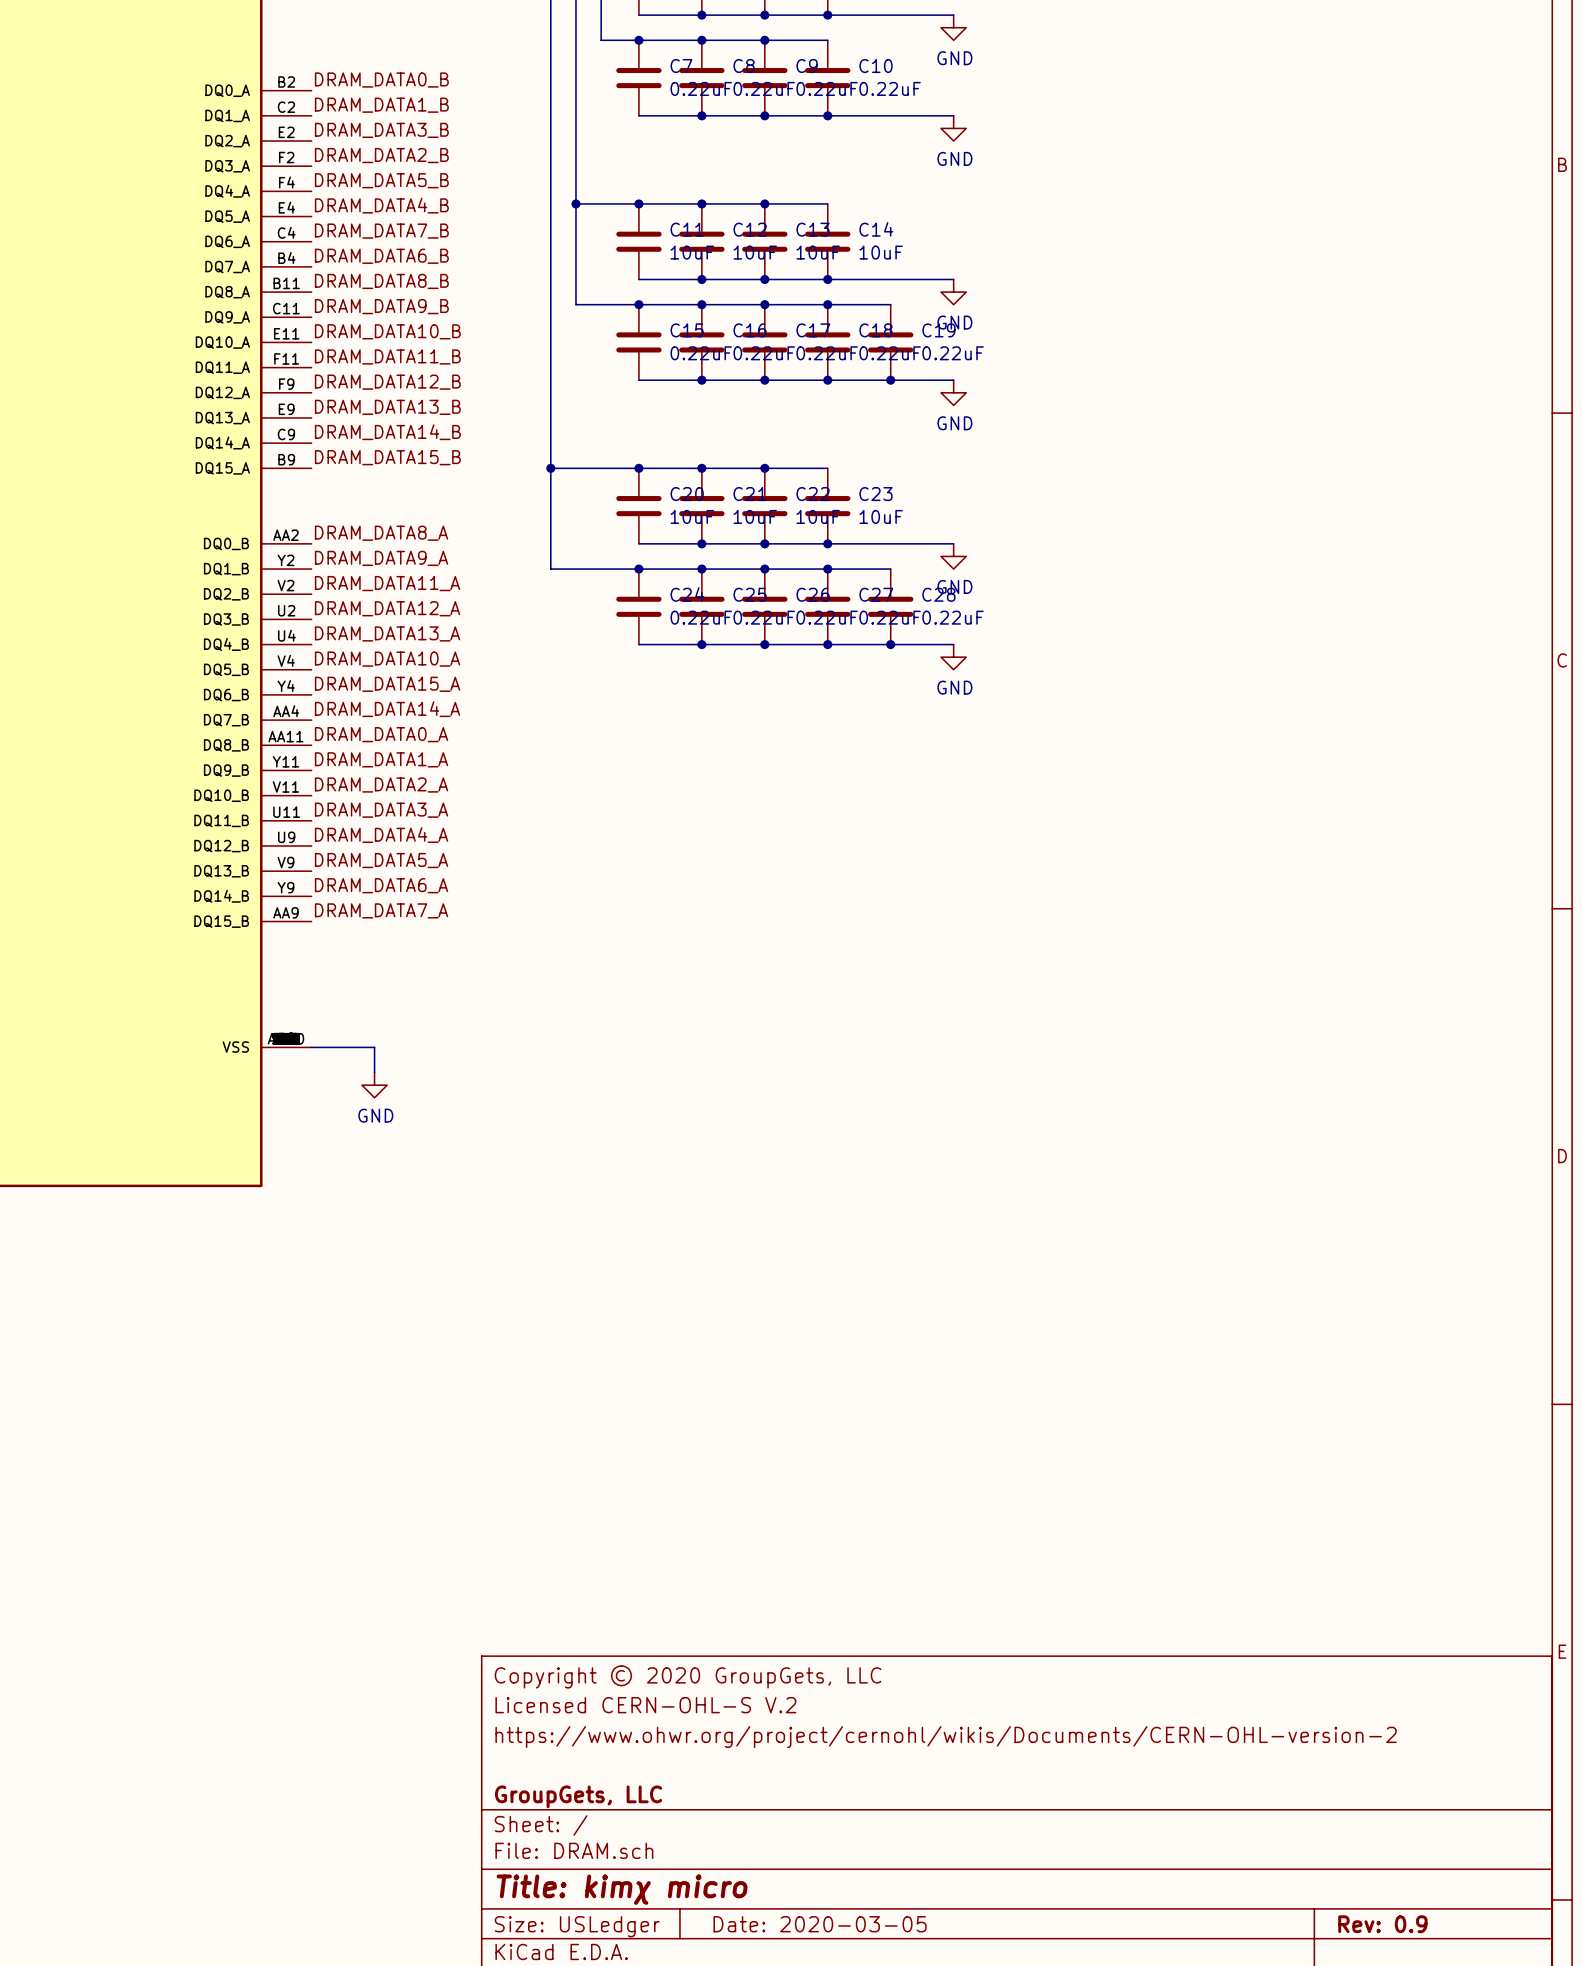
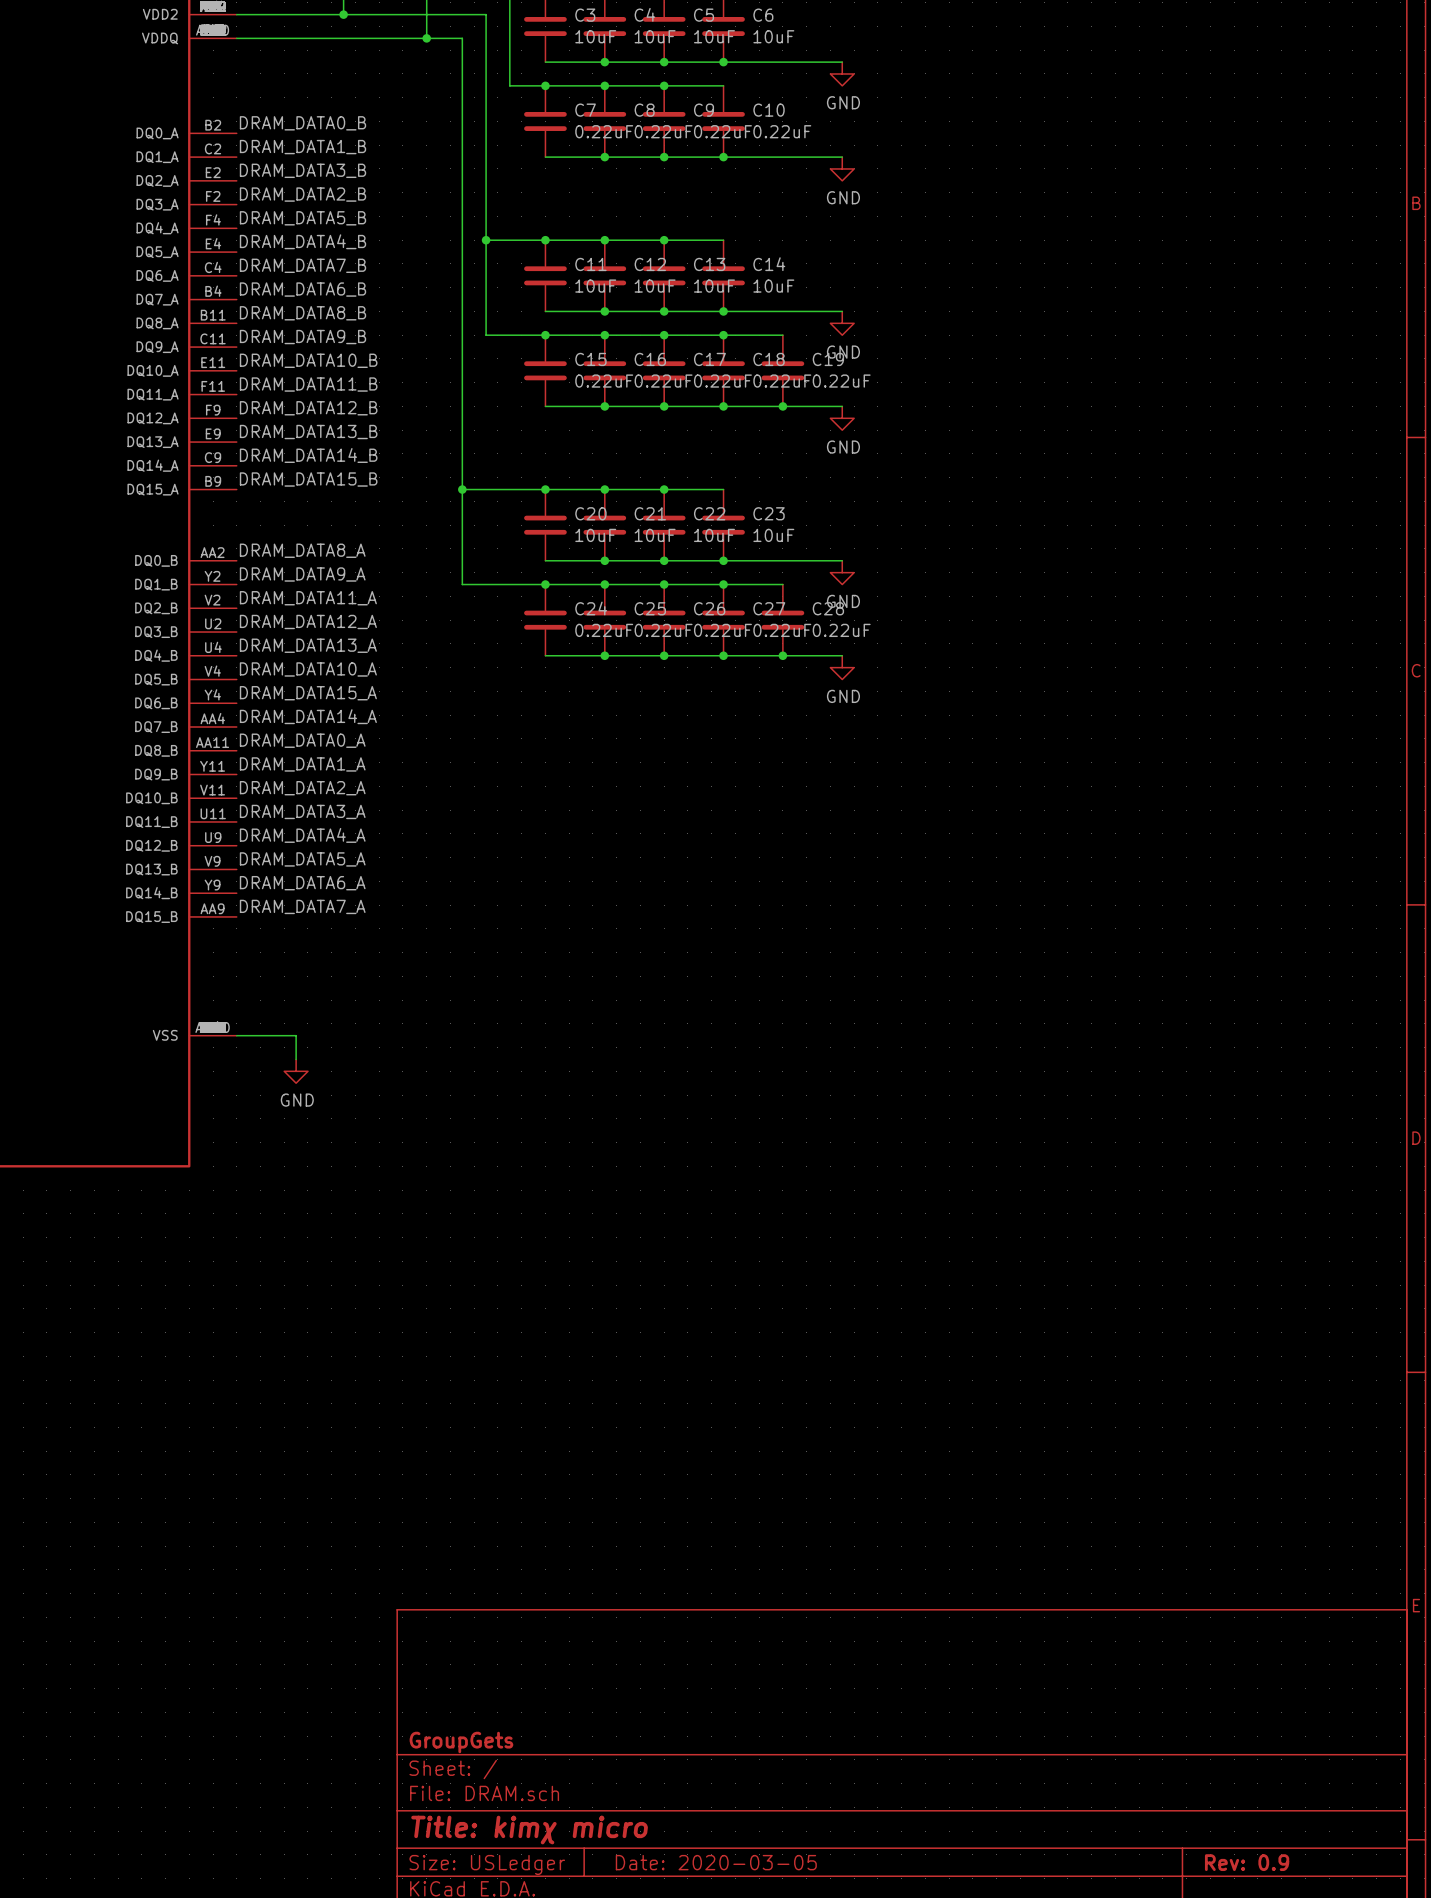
title block: Copyright © 2020 GroupGets, LLC (688, 1676) -> none
title block: Licensed CERN-OHL-S V.2 (645, 1705) -> none
title block: https://www.ohwr.org/project/cernohl/wikis/Documents/CERN-OHL-version-2 (946, 1737) -> none
title block: GroupGets, LLC (578, 1796) -> GroupGets (461, 1742)

